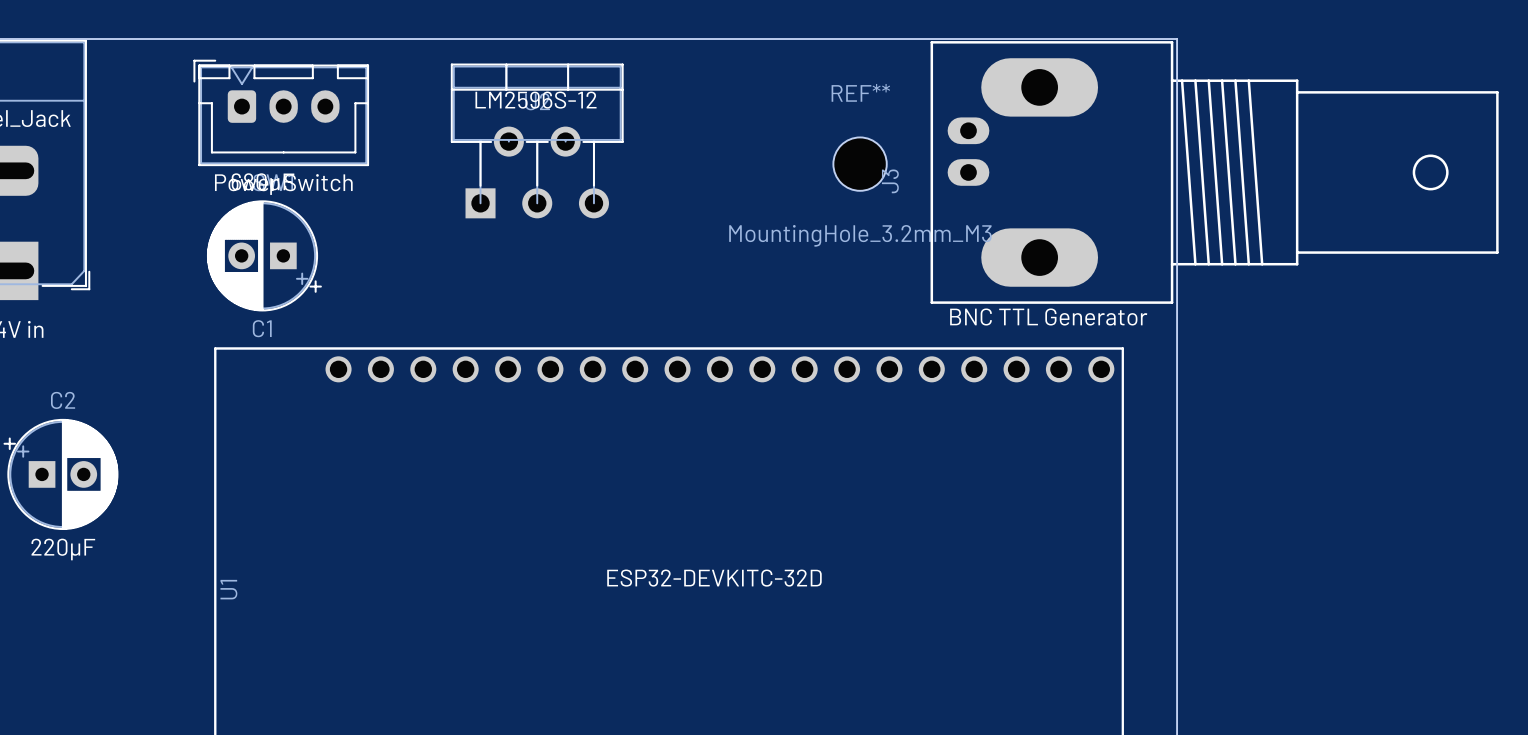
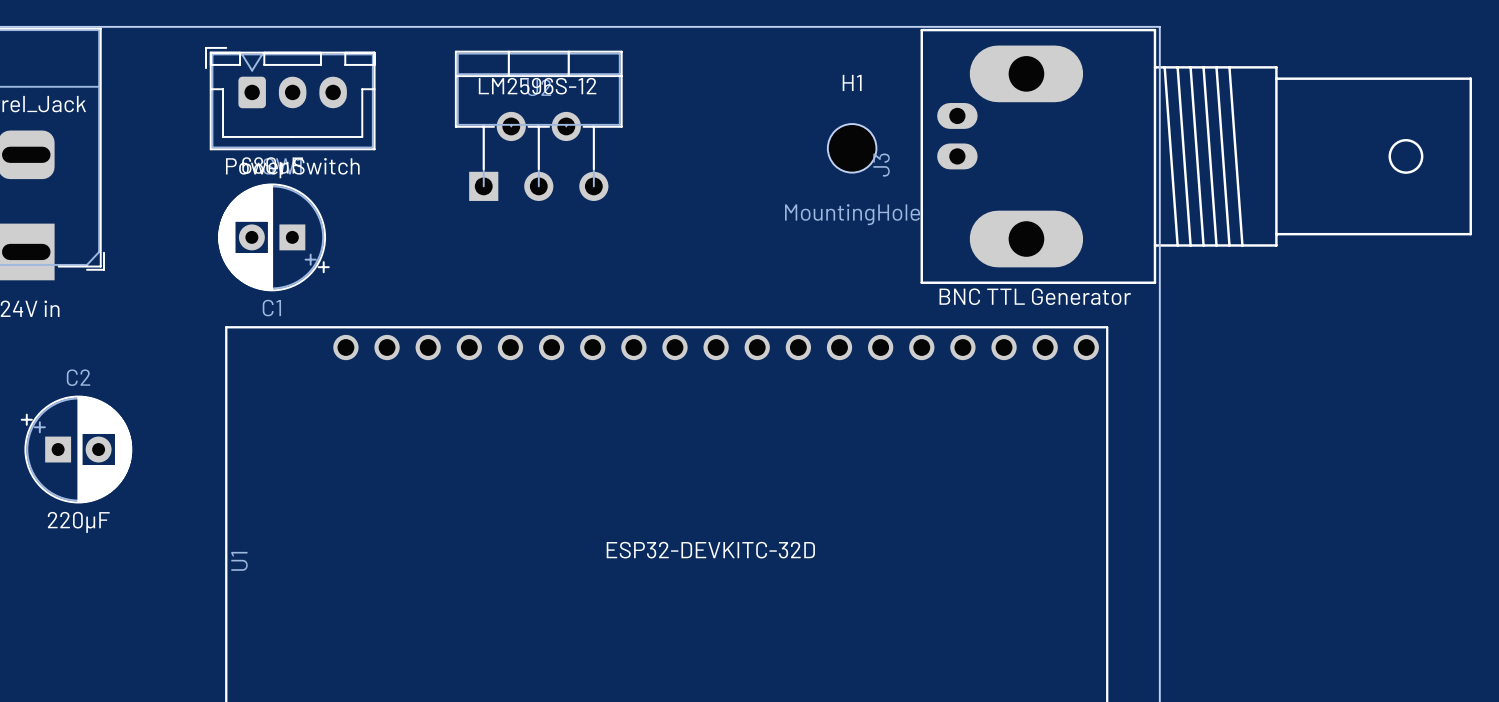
REF**: MountingHole_3.2mm_M3 (860, 164) -> none
H1: none -> MountingHole (852, 148)

